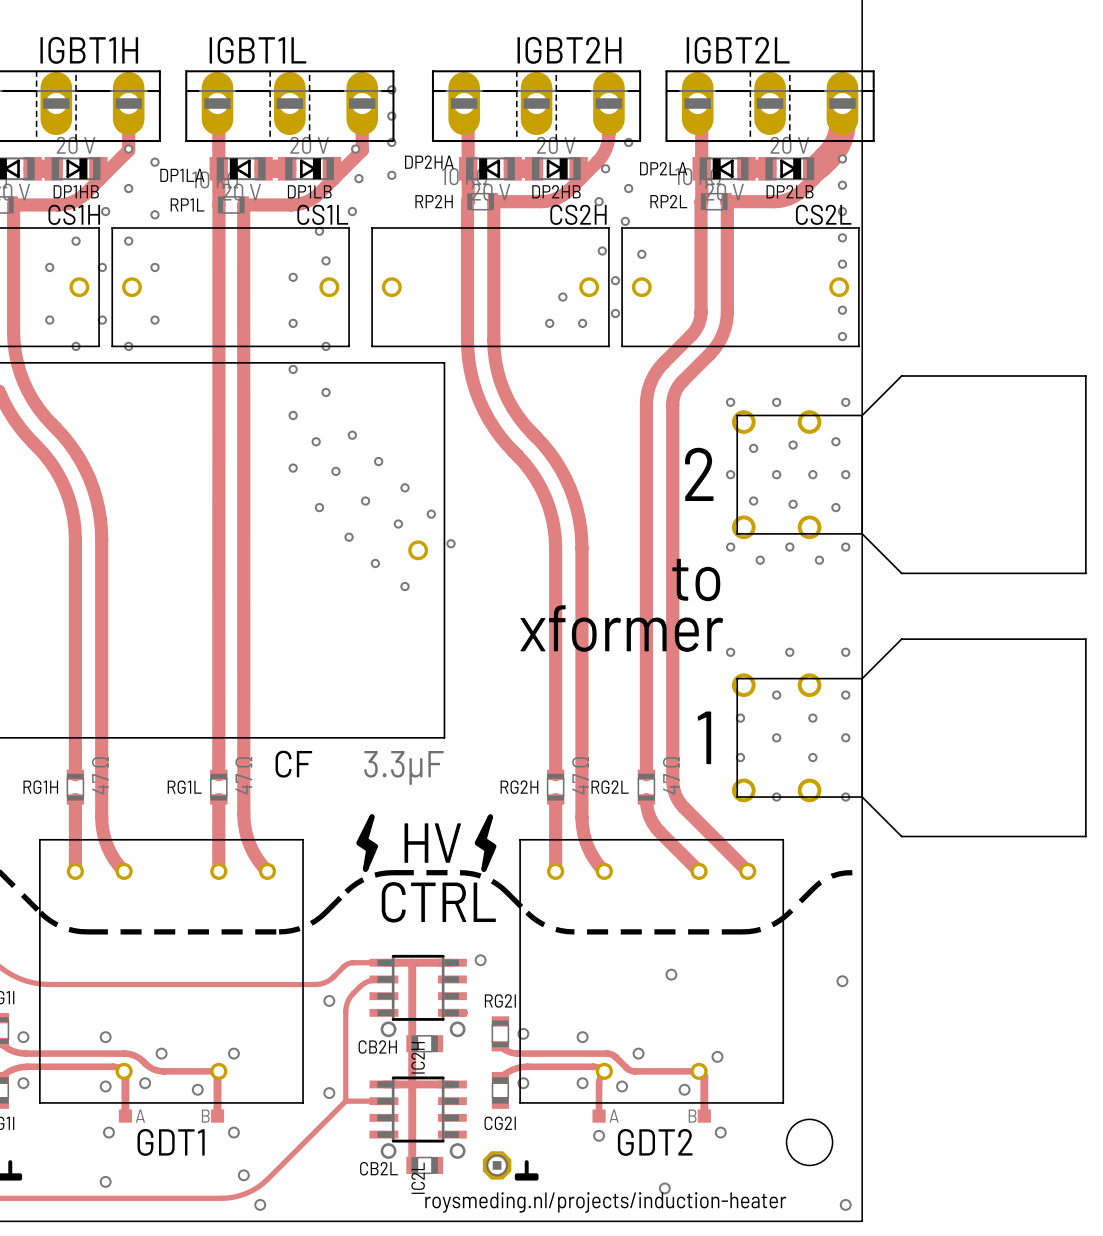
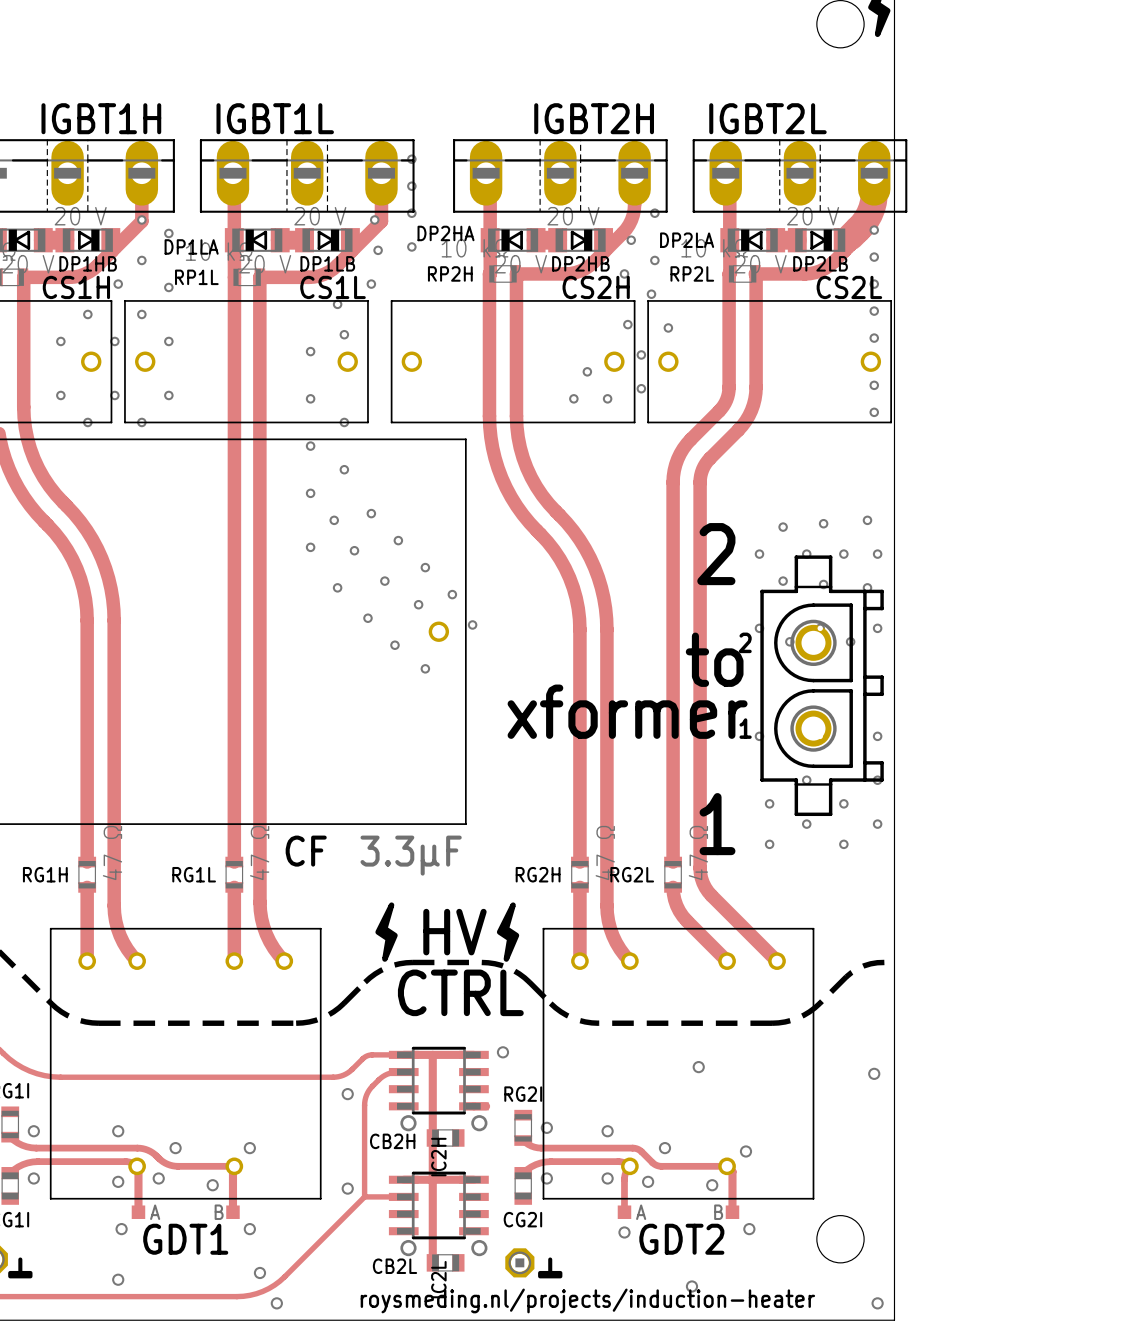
via: (730, 402) -> none
via: (776, 402) -> none
via: (845, 402) -> none
part: (909, 474) -> none
part: none -> (822, 685)
part: (909, 737) -> none
via: (776, 797) -> none
via: (845, 797) -> none

